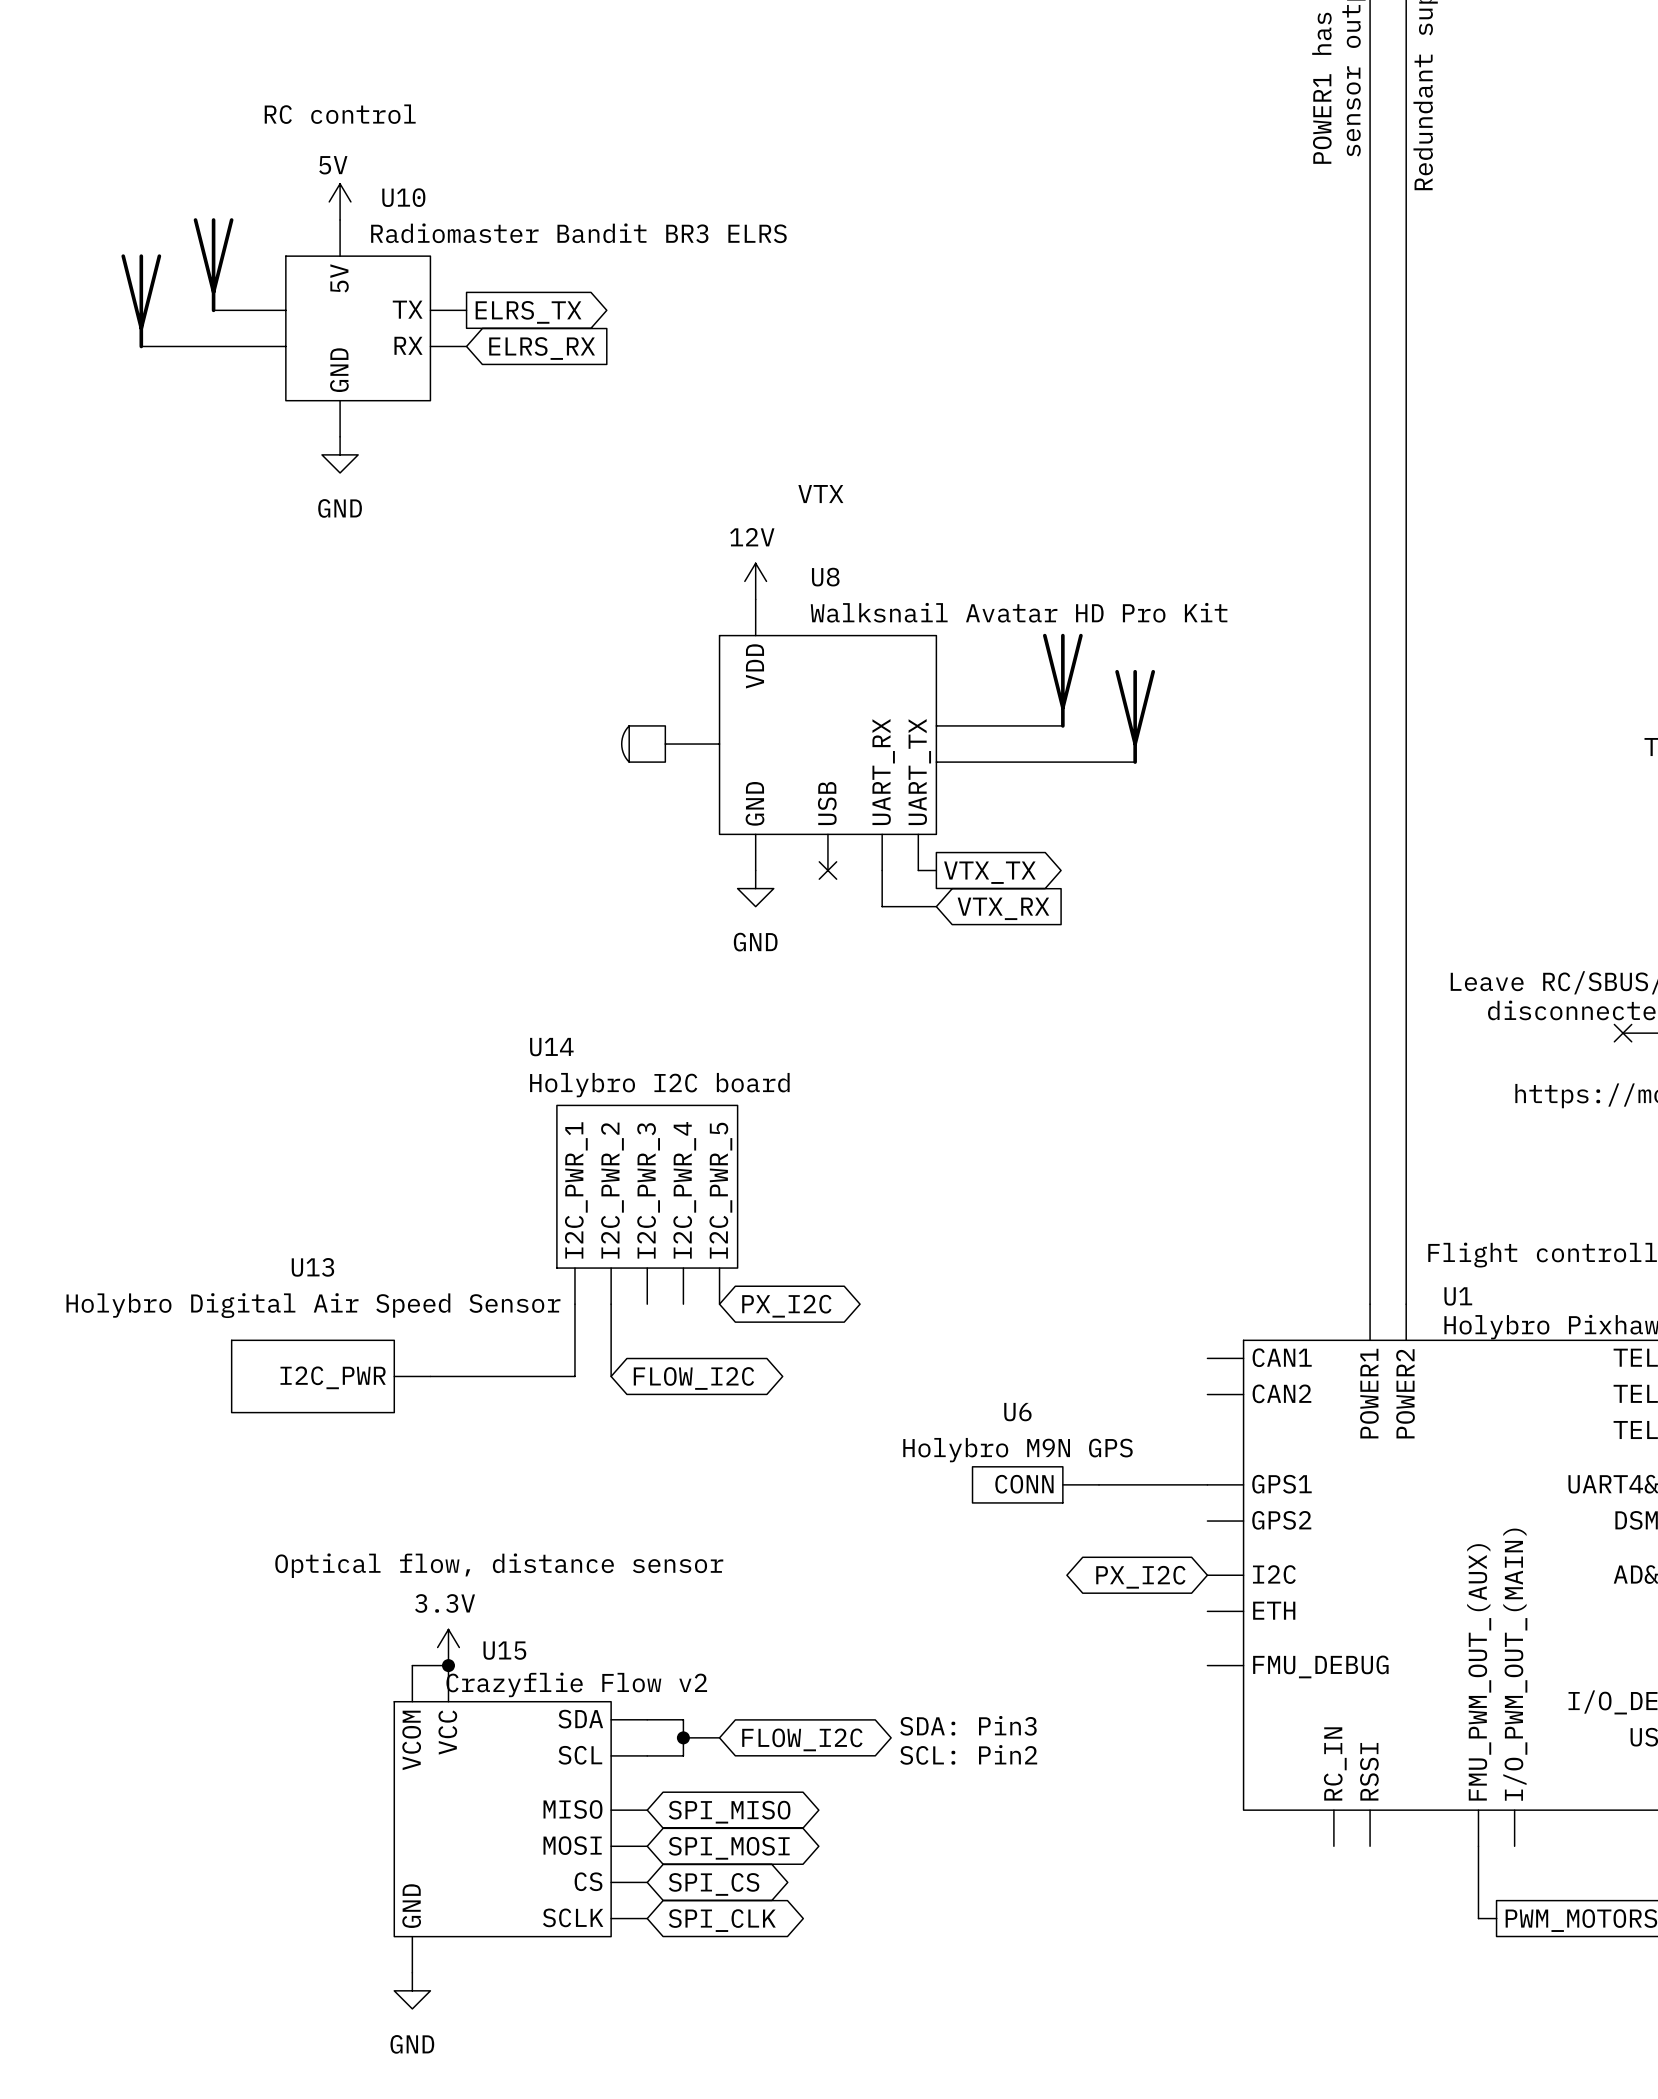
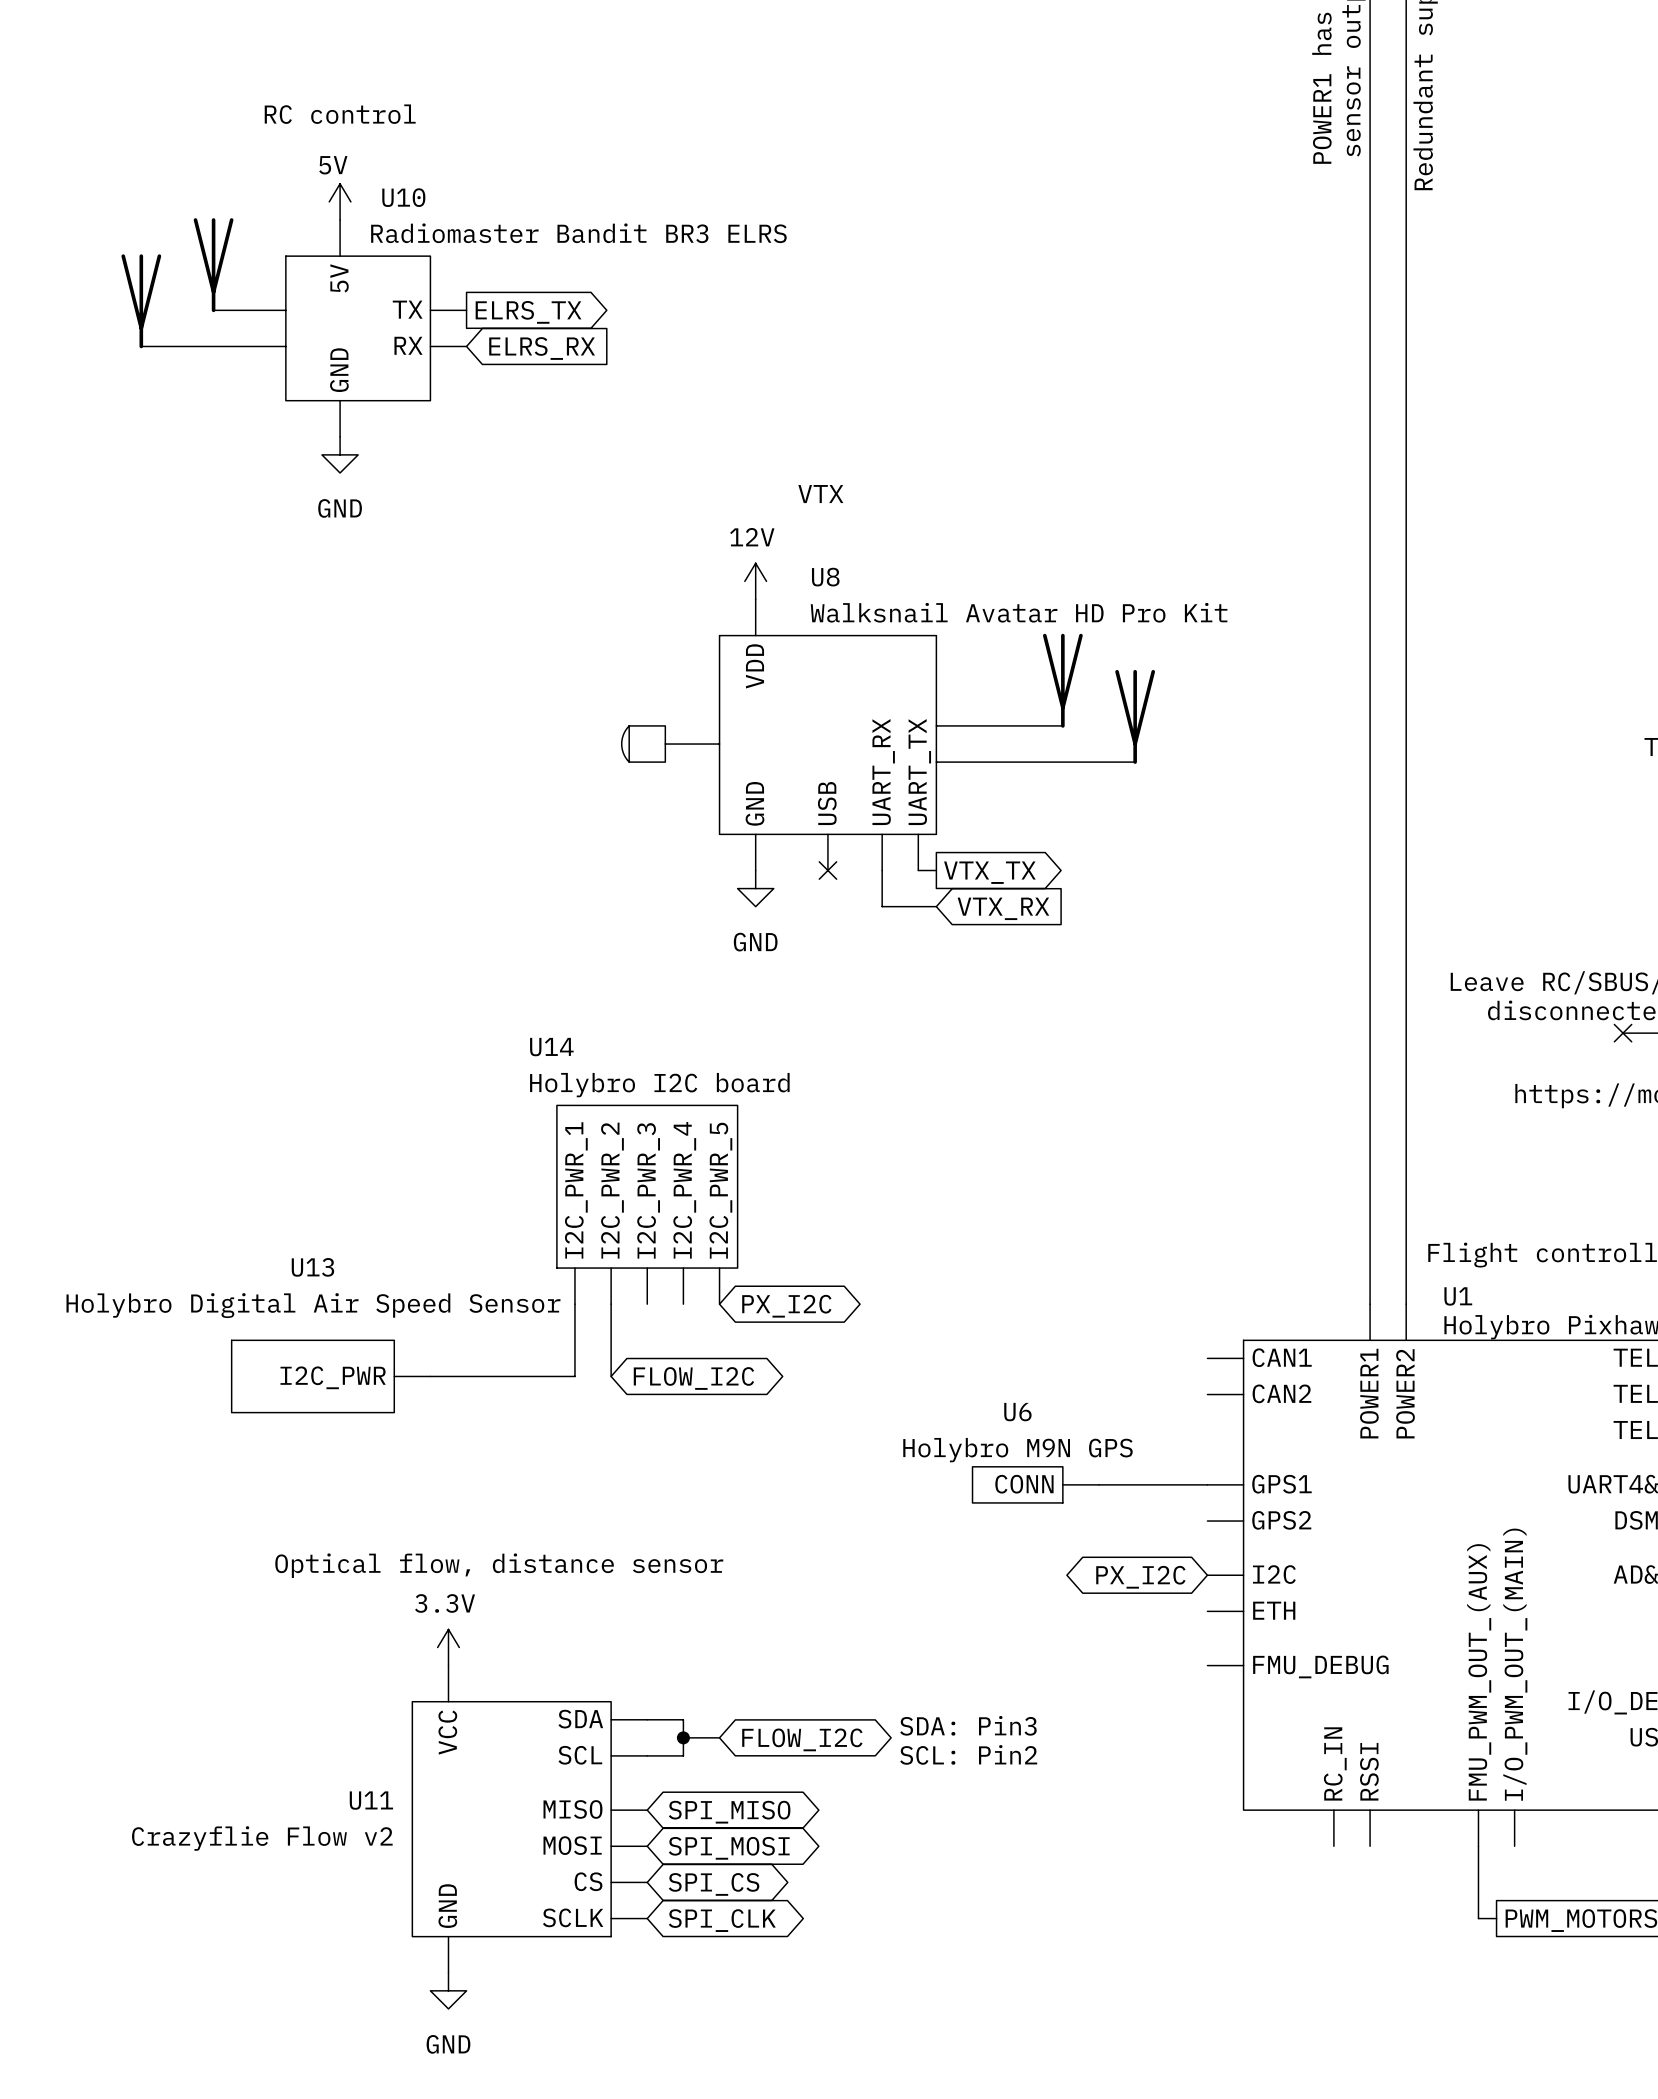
wire: (412, 1665) (448, 1665) -> none
junction: (448, 1665) -> none
U15: Crazyflie Flow v2 (520, 1819) -> none
U11: none -> Crazyflie Flow v2 (529, 1819)
power symbol position: GND (412, 1990) -> GND (448, 1990)

